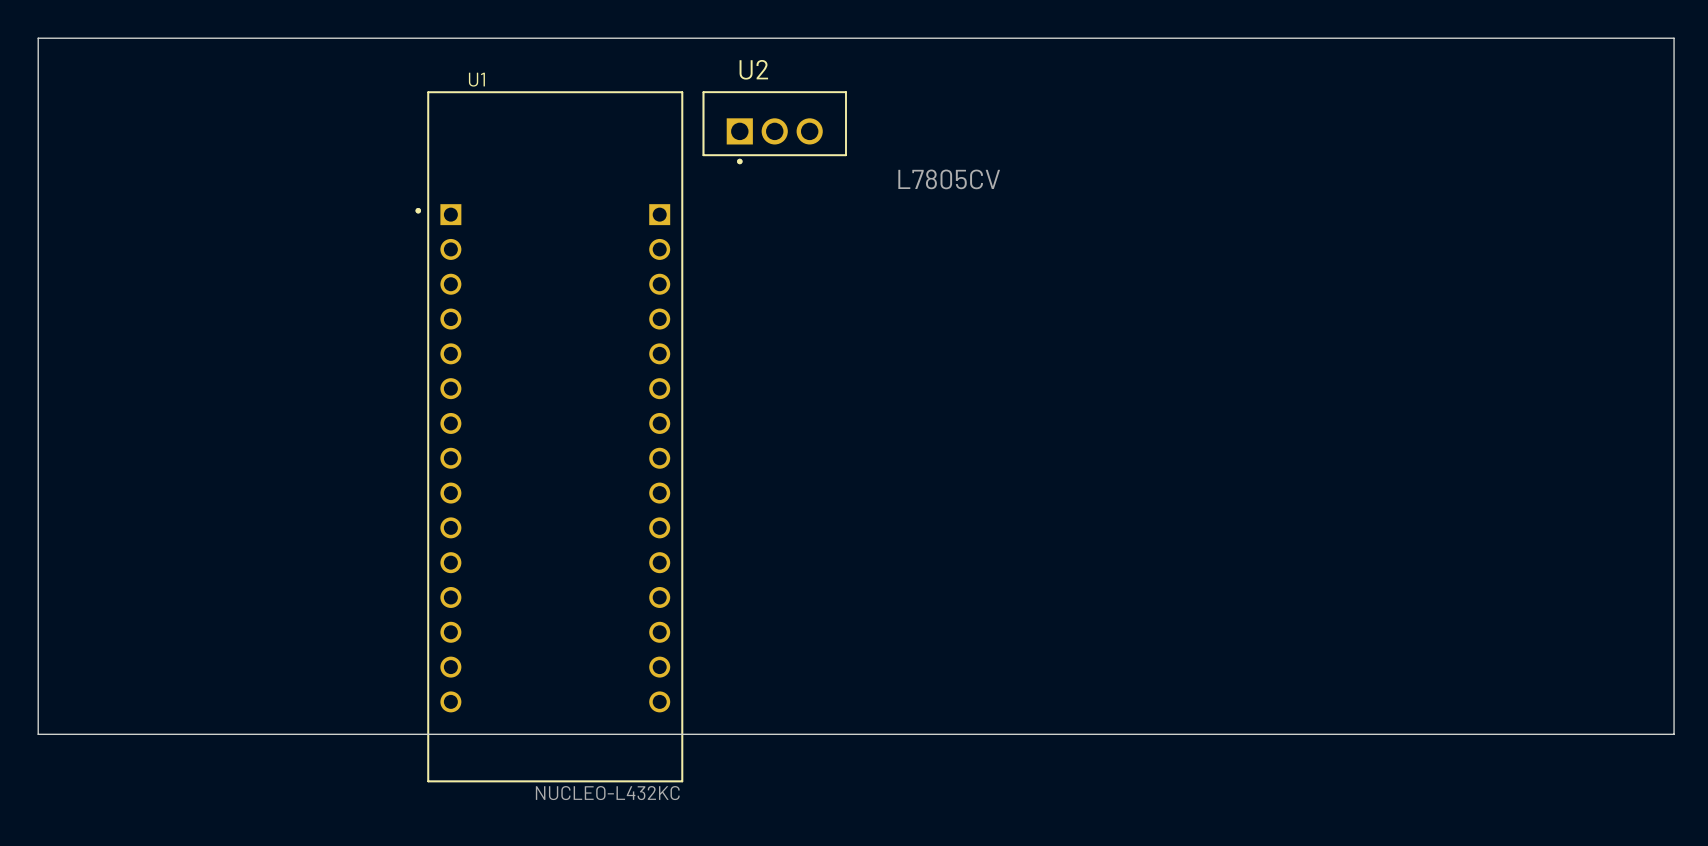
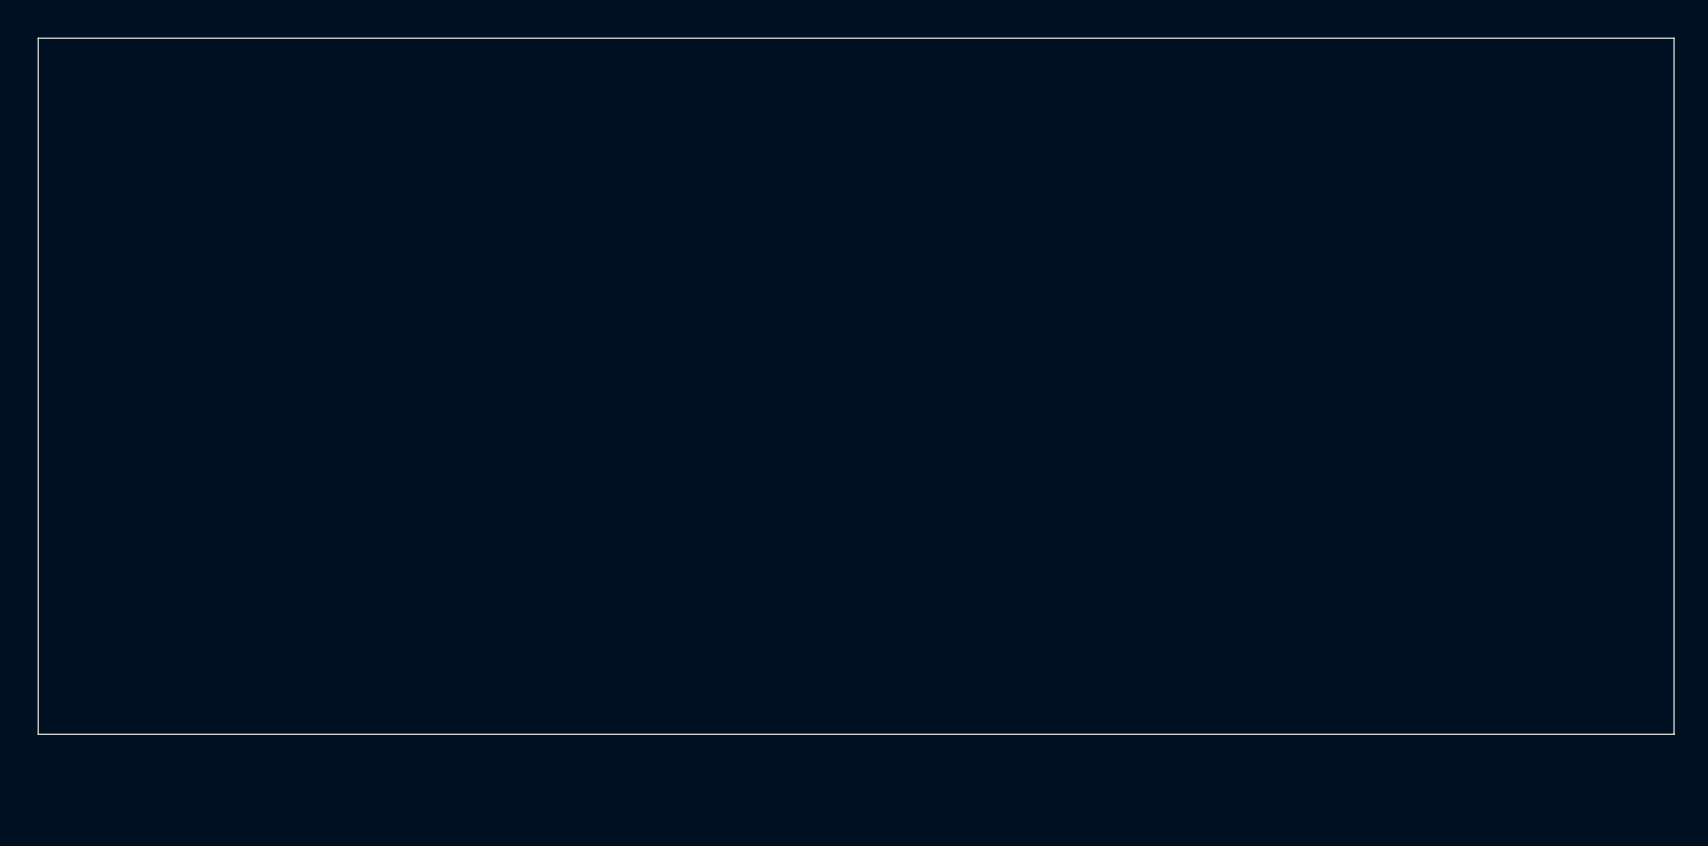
U2: L7805CV (774, 127) -> none
U1: NUCLEO-L432KC (549, 436) -> none

